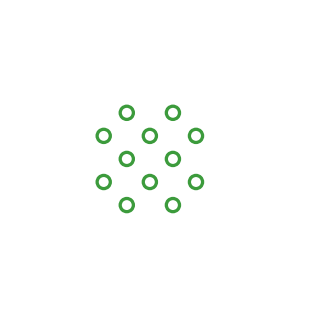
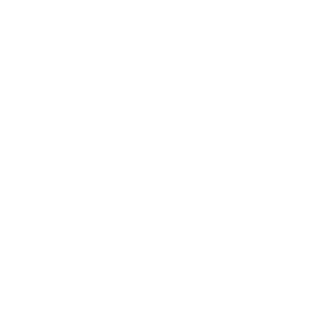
part: (149, 158) -> none

